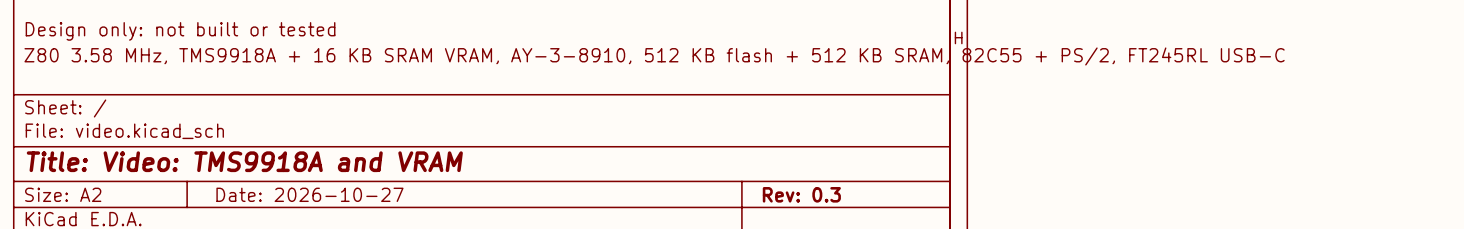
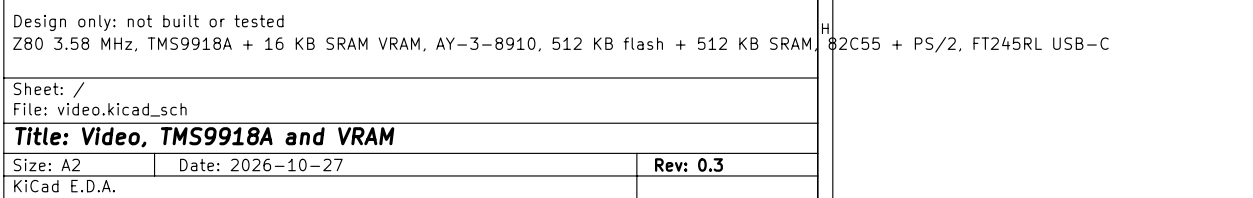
title block: Title: Video: TMS9918A and VRAM (244, 161) -> Title: Video, TMS9918A and VRAM (204, 137)

